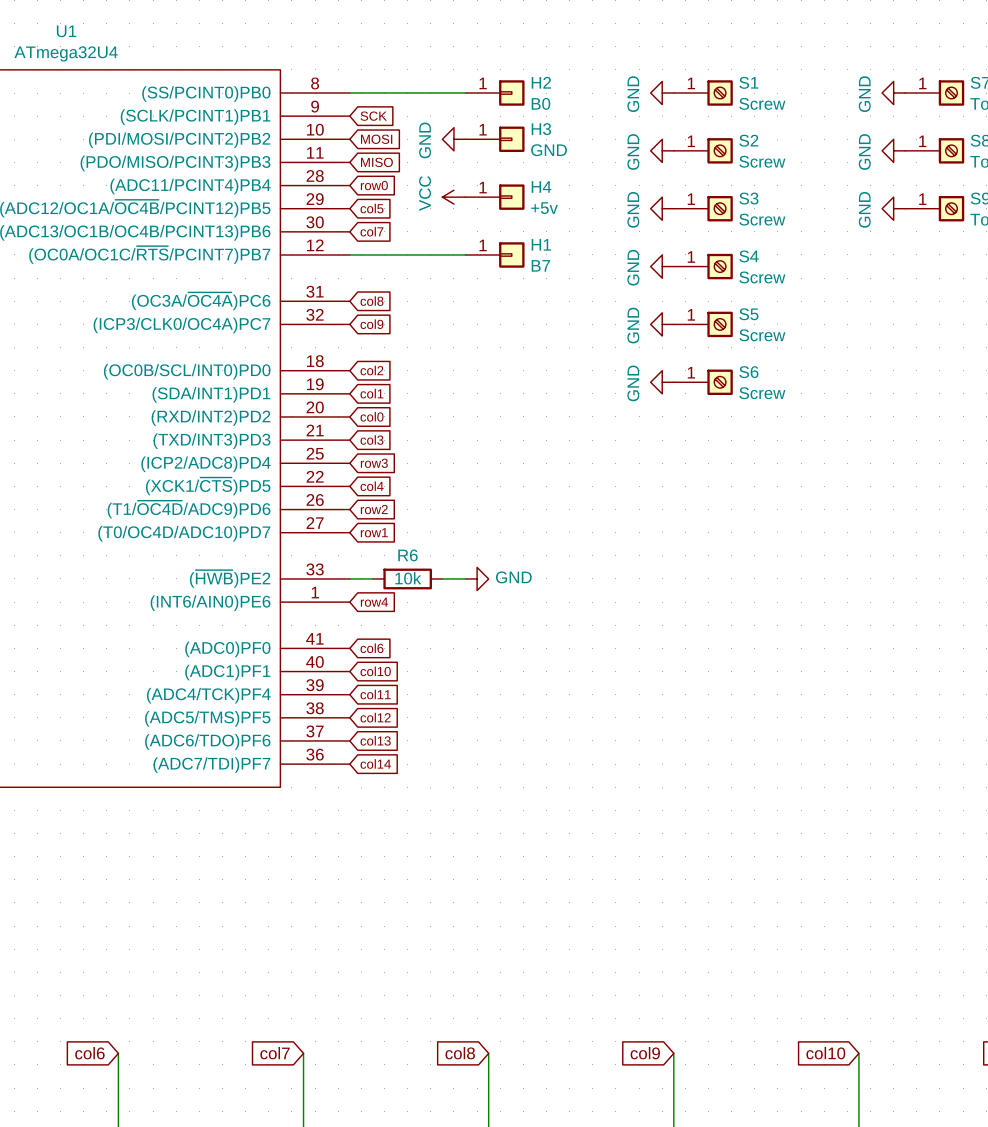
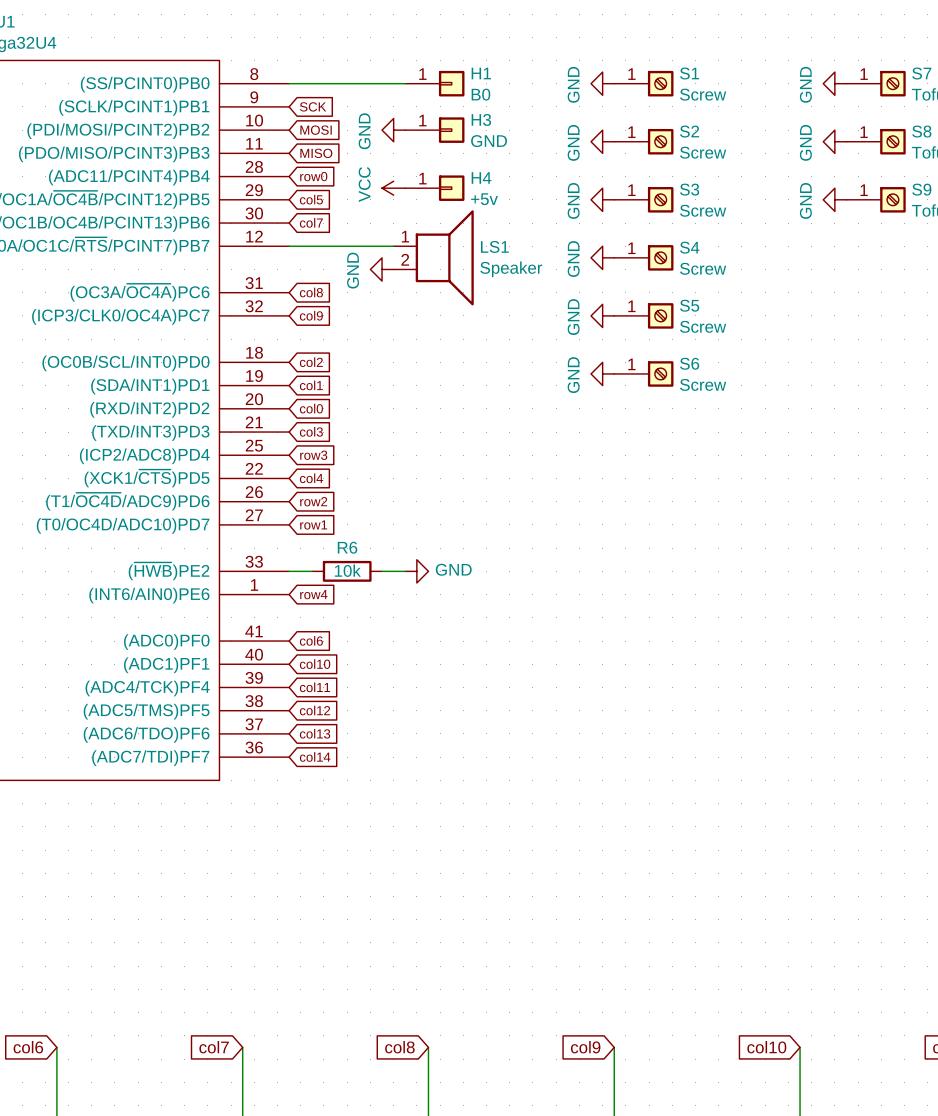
H2 name: H2 (541, 82) -> H1 (481, 73)
H1: B7 (495, 254) -> none
LS1: none -> Speaker (433, 257)
power symbol: none -> GND (382, 269)

